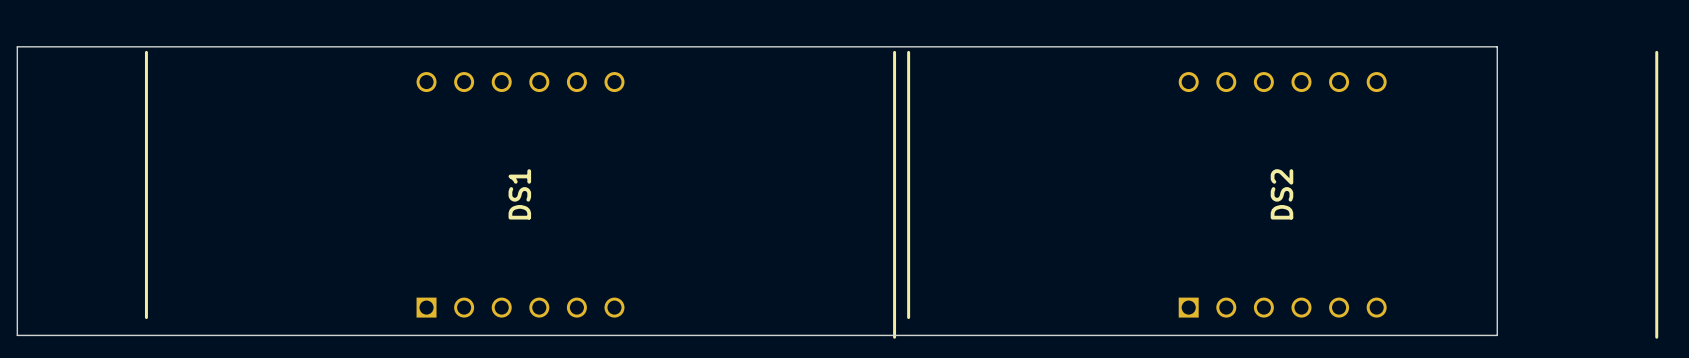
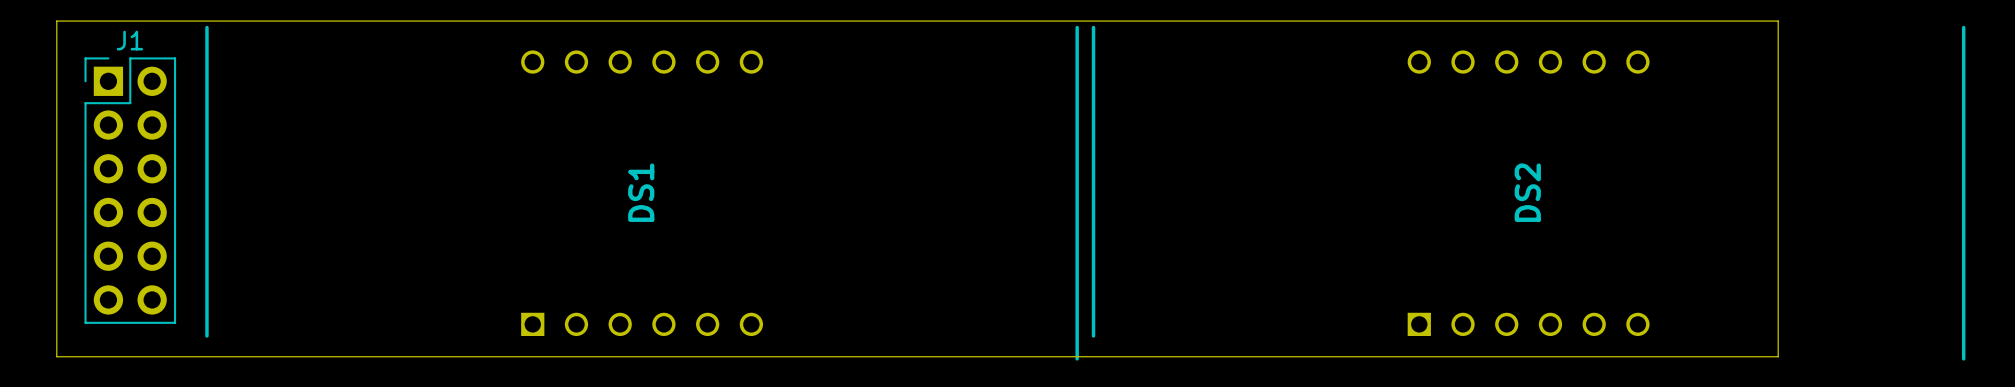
J1: none -> (130, 190)

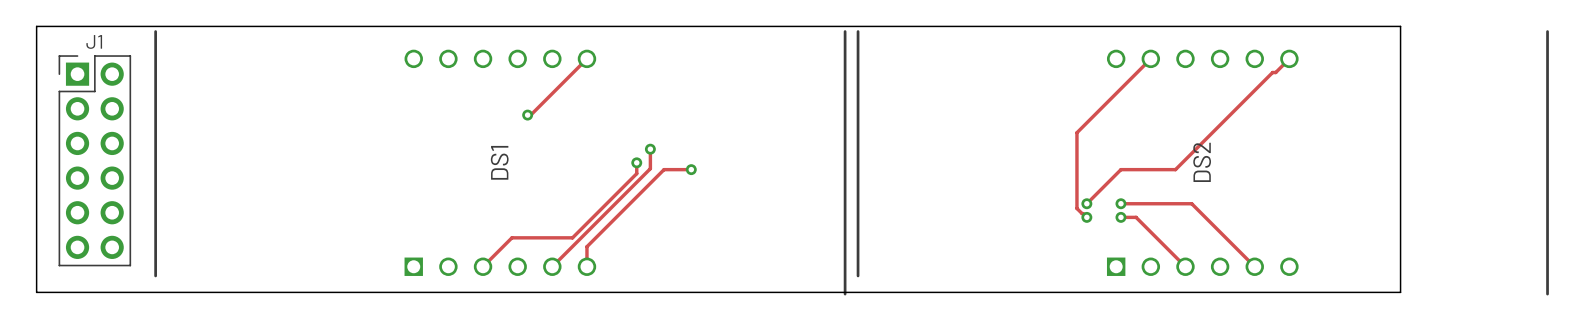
track: none -> (586, 58) (530, 115) (527, 115)
track: none -> (1150, 58) (1076, 132) (1076, 208) (1086, 217)
track: none -> (1289, 58) (1275, 72) (1272, 72) (1175, 169) (1120, 169) (1086, 203)
via: none -> (527, 115)
track: none -> (650, 149) (650, 168) (552, 266)
via: none -> (650, 149)
track: none -> (636, 162) (636, 173) (572, 237) (511, 237) (483, 266)
via: none -> (636, 162)
track: none -> (691, 169) (664, 169) (586, 246) (586, 266)
via: none -> (691, 169)
via: none -> (1086, 203)
track: none -> (1120, 203) (1191, 203) (1254, 266)
via: none -> (1120, 203)
via: none -> (1086, 217)
track: none -> (1120, 217) (1136, 217) (1185, 266)
via: none -> (1120, 217)

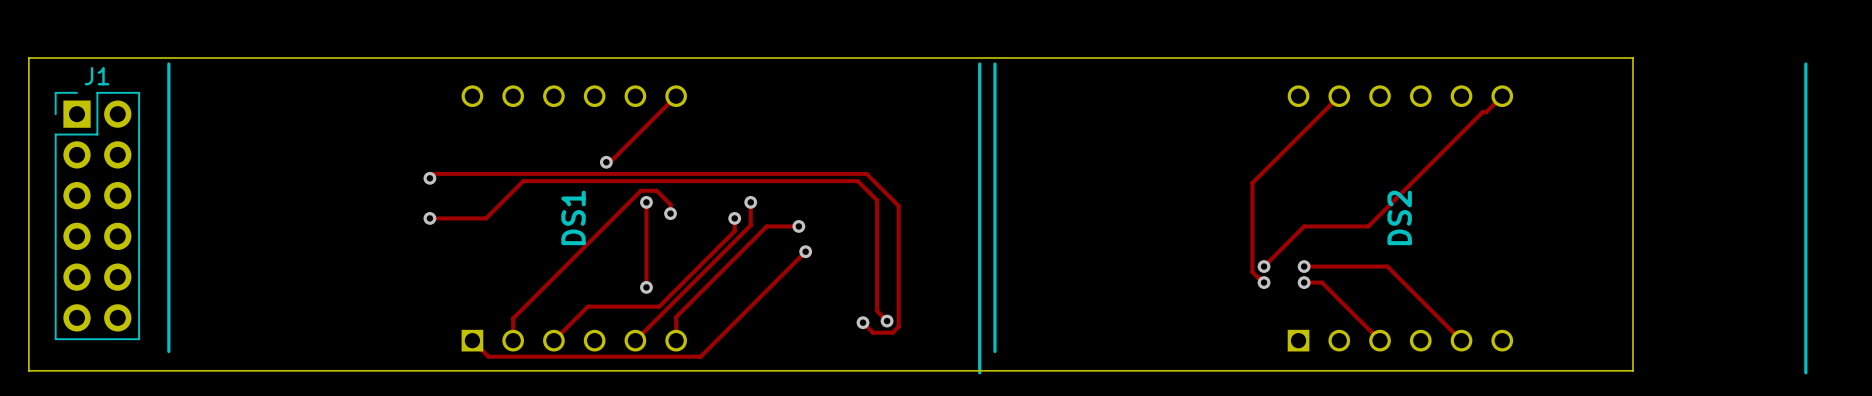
track: none -> (429, 178) (434, 173) (866, 173) (898, 205) (898, 326) (892, 332) (873, 332) (863, 322)
via: none -> (429, 178)
track: none -> (646, 202) (646, 287)
via: none -> (646, 202)
track: none -> (670, 213) (670, 204) (656, 190) (640, 190) (513, 318) (513, 340)
via: none -> (670, 213)
track: none -> (429, 218) (486, 218) (523, 181) (857, 181) (877, 200) (877, 311) (887, 321)
via: none -> (429, 218)
track: none -> (805, 251) (700, 356) (488, 356) (472, 340)
via: none -> (805, 251)
via: none -> (646, 287)
via: none -> (887, 321)
via: none -> (863, 322)

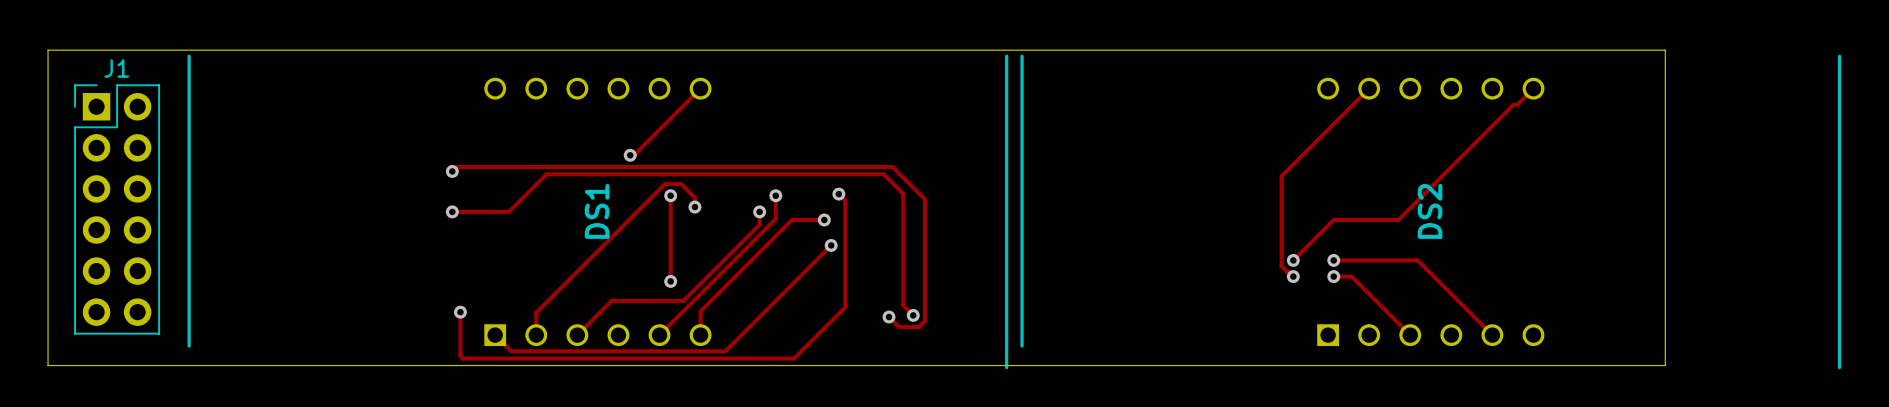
track: none -> (838, 194) (845, 200) (845, 307) (794, 358) (463, 358) (460, 355) (460, 312)
via: none -> (838, 194)
via: none -> (460, 312)

